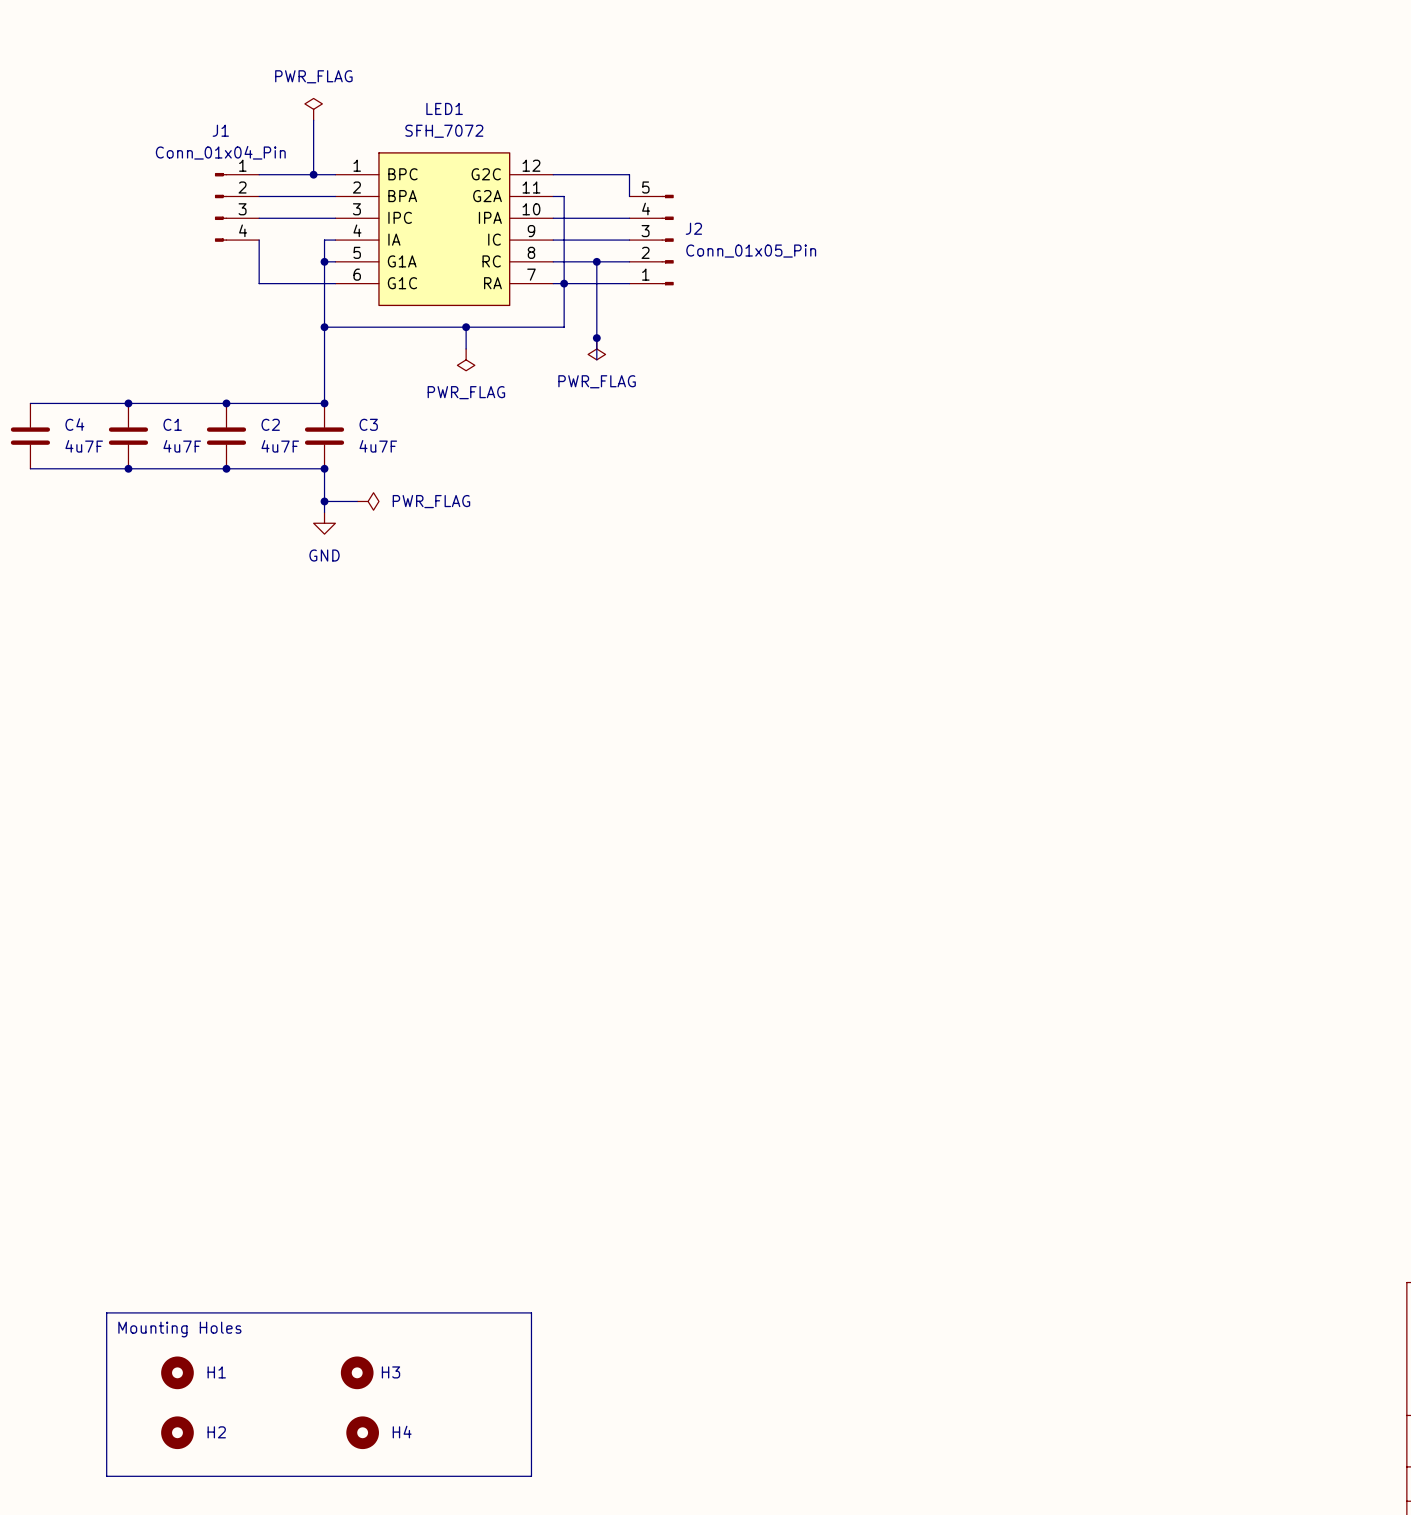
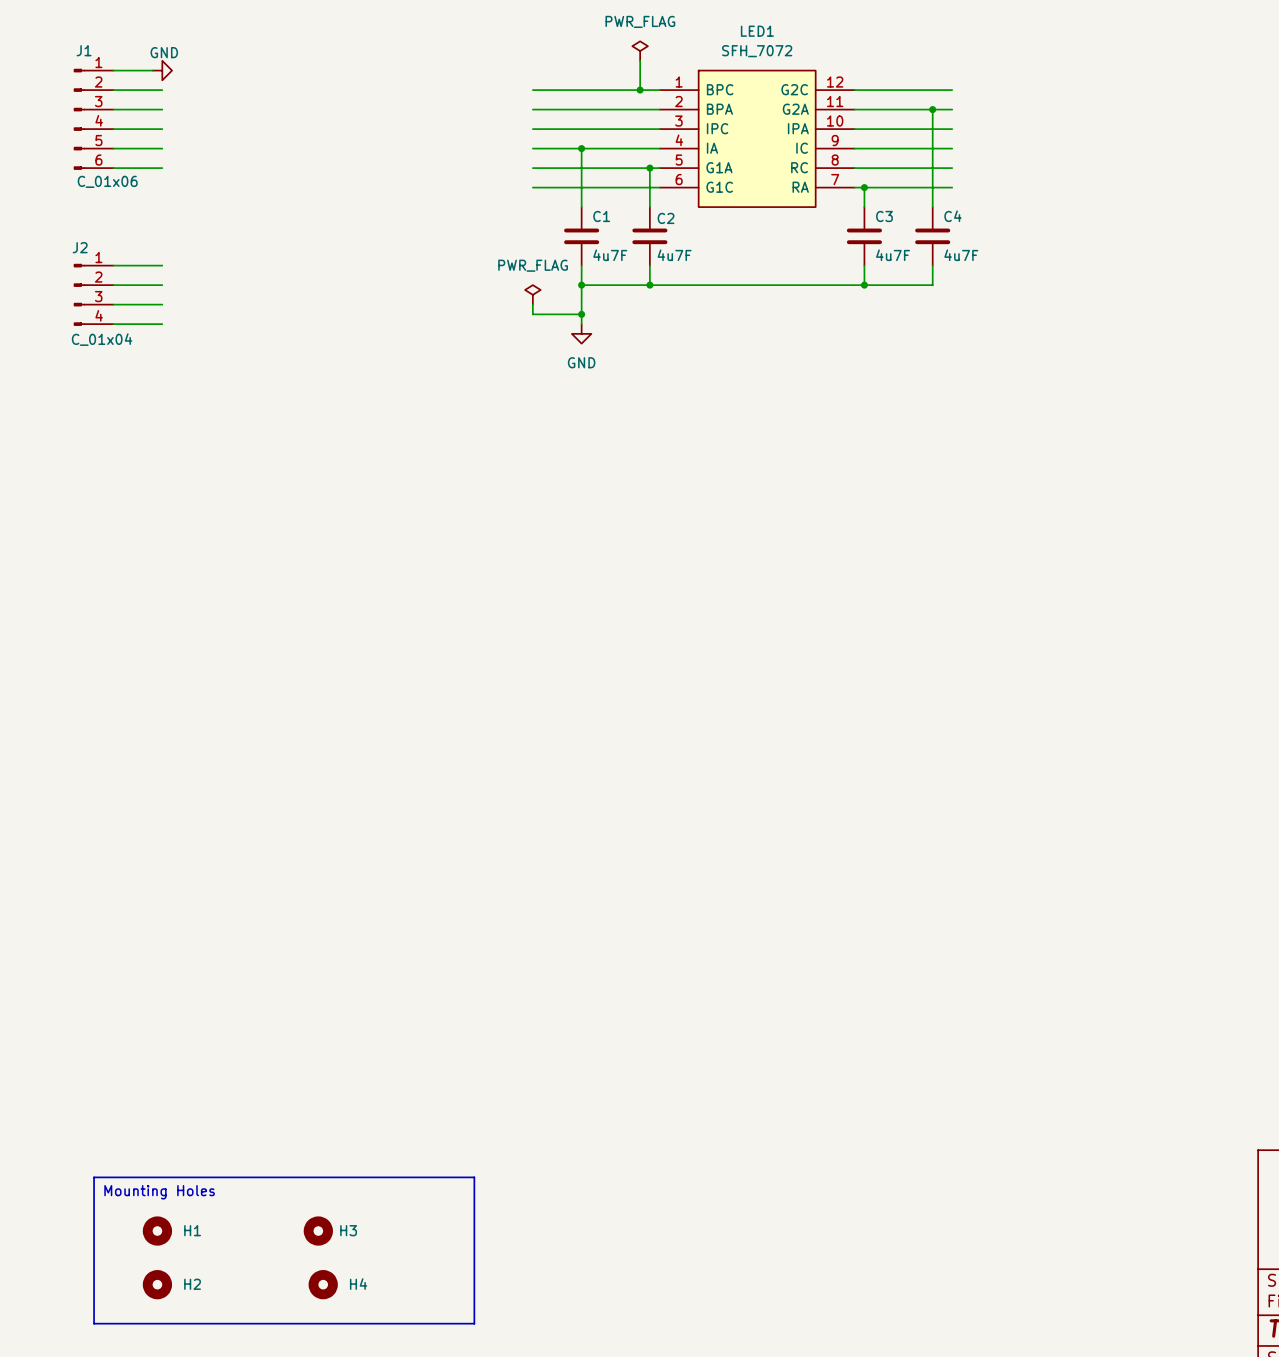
power symbol: none -> PWR_FLAG (640, 51)
wire: none -> (640, 60) (640, 90)
wire: none -> (113, 70) (152, 70)
power symbol: none -> GND (162, 70)
wire: none -> (113, 90) (162, 90)
wire: none -> (532, 90) (659, 90)
junction: none -> (640, 90)
wire: none -> (854, 90) (952, 90)
power symbol: PWR_FLAG (313, 109) -> none
wire: none -> (113, 109) (162, 109)
wire: (313, 120) (313, 174) -> none
wire: none -> (532, 109) (659, 109)
wire: none -> (854, 109) (952, 109)
wire: none -> (932, 109) (932, 207)
junction: none -> (932, 109)
wire: none -> (113, 129) (162, 129)
wire: none -> (532, 129) (659, 129)
wire: none -> (854, 129) (952, 129)
J1 value: Conn_01x04_Pin (220, 152) -> C_01x06 (107, 181)
wire: none -> (113, 148) (162, 148)
wire: none -> (532, 148) (659, 148)
wire: none -> (581, 148) (581, 207)
junction: none -> (581, 148)
wire: none -> (854, 148) (952, 148)
J1 symbol: [214, 172, 260, 242] -> [73, 69, 114, 170]
wire: (259, 174) (335, 174) -> none
junction: (313, 174) -> none
wire: (553, 174) (629, 174) (629, 196) -> none
wire: none -> (113, 168) (162, 168)
wire: none -> (532, 168) (659, 168)
wire: none -> (649, 168) (649, 207)
junction: none -> (649, 168)
wire: none -> (854, 168) (952, 168)
J2 symbol: [629, 194, 674, 286] -> [73, 264, 114, 326]
wire: (259, 196) (335, 196) -> none
wire: (553, 196) (564, 196) (564, 327) (324, 327) -> none
wire: none -> (532, 187) (659, 187)
wire: none -> (854, 187) (952, 187)
wire: none -> (864, 187) (864, 207)
junction: none -> (864, 187)
wire: (259, 218) (335, 218) -> none
wire: (553, 218) (629, 218) -> none
J2 name position: J2 (693, 228) -> J2 (80, 247)
LED1 position: (444, 229) -> (757, 138)
wire: (259, 240) (259, 283) (335, 283) -> none
wire: (335, 240) (324, 240) (324, 403) (30, 403) -> none
wire: (553, 240) (629, 240) -> none
J2 value: Conn_01x05_Pin (751, 251) -> C_01x04 (102, 339)
wire: (324, 261) (335, 261) -> none
junction: (324, 261) -> none
wire: (553, 261) (629, 261) -> none
wire: (596, 261) (596, 338) -> none
junction: (596, 261) -> none
wire: (553, 283) (629, 283) -> none
junction: (564, 283) -> none
wire: none -> (113, 265) (162, 265)
wire: none -> (581, 265) (581, 324)
wire: none -> (649, 265) (649, 285)
wire: none -> (864, 265) (864, 285)
wire: none -> (932, 265) (932, 285) (581, 285)
wire: none -> (113, 285) (162, 285)
junction: none -> (581, 285)
junction: none -> (649, 285)
junction: none -> (864, 285)
junction: (324, 327) -> none
wire: (466, 327) (466, 348) -> none
junction: (466, 327) -> none
wire: none -> (113, 304) (162, 304)
junction: (596, 338) -> none
wire: (596, 348) (596, 359) -> (532, 314) (581, 314)
power symbol rotation: 0° (596, 348) -> 180° (532, 294)
power symbol position: PWR_FLAG (596, 348) -> PWR_FLAG (532, 294)
junction: none -> (581, 314)
wire: none -> (113, 324) (162, 324)
power symbol: PWR_FLAG (466, 359) -> none
power symbol: none -> GND (581, 333)
junction: (128, 403) -> none
junction: (226, 403) -> none
junction: (324, 403) -> none
C4 name position: C4 (74, 424) -> C4 (952, 216)
C1 name position: C1 (172, 424) -> C1 (601, 216)
C2 name position: C2 (270, 424) -> C2 (666, 218)
C3 name position: C3 (368, 424) -> C3 (884, 216)
C4 position: (30, 436) -> (932, 236)
C1 position: (128, 436) -> (581, 236)
C2 position: (226, 436) -> (649, 236)
C3 position: (324, 436) -> (864, 236)
C4 value position: 4u7F (84, 446) -> 4u7F (961, 255)
C1 value position: 4u7F (182, 446) -> 4u7F (610, 255)
C2 value position: 4u7F (280, 446) -> 4u7F (674, 255)
C3 value position: 4u7F (378, 446) -> 4u7F (893, 255)
wire: (30, 468) (324, 468) (324, 512) -> none
junction: (128, 468) -> none
junction: (226, 468) -> none
junction: (324, 468) -> none
wire: (324, 501) (357, 501) -> none
junction: (324, 501) -> none
power symbol: PWR_FLAG (368, 501) -> none
power symbol: GND (324, 523) -> none

